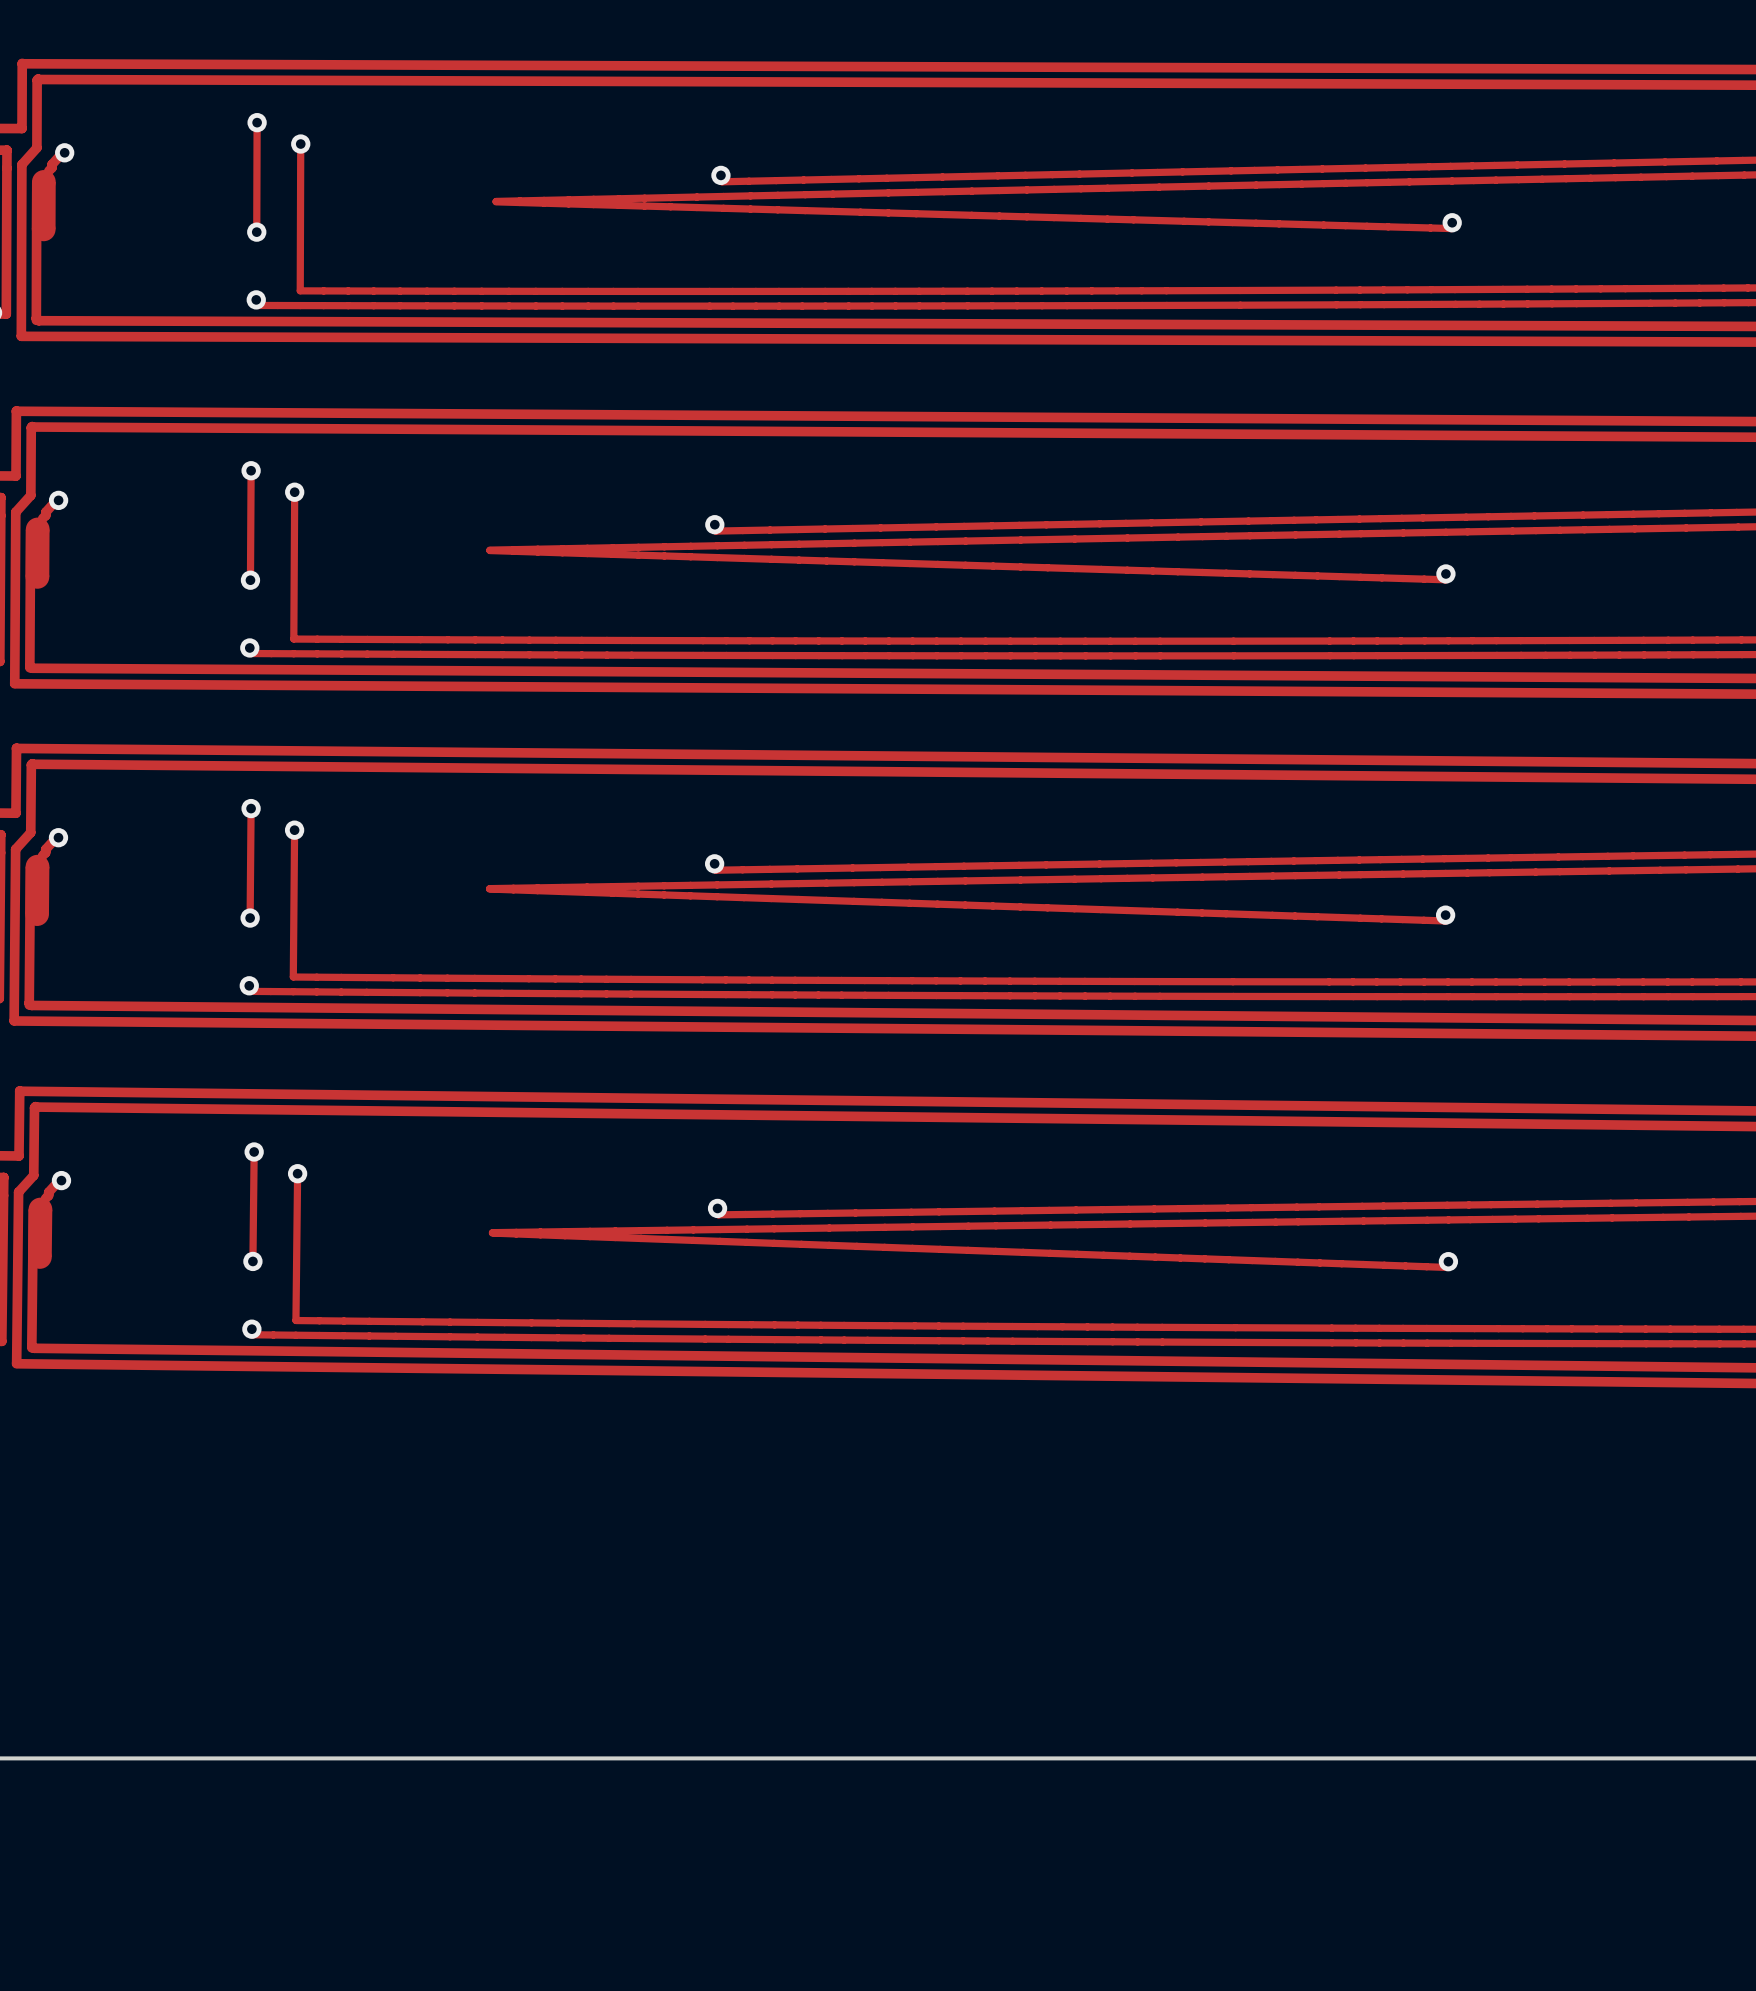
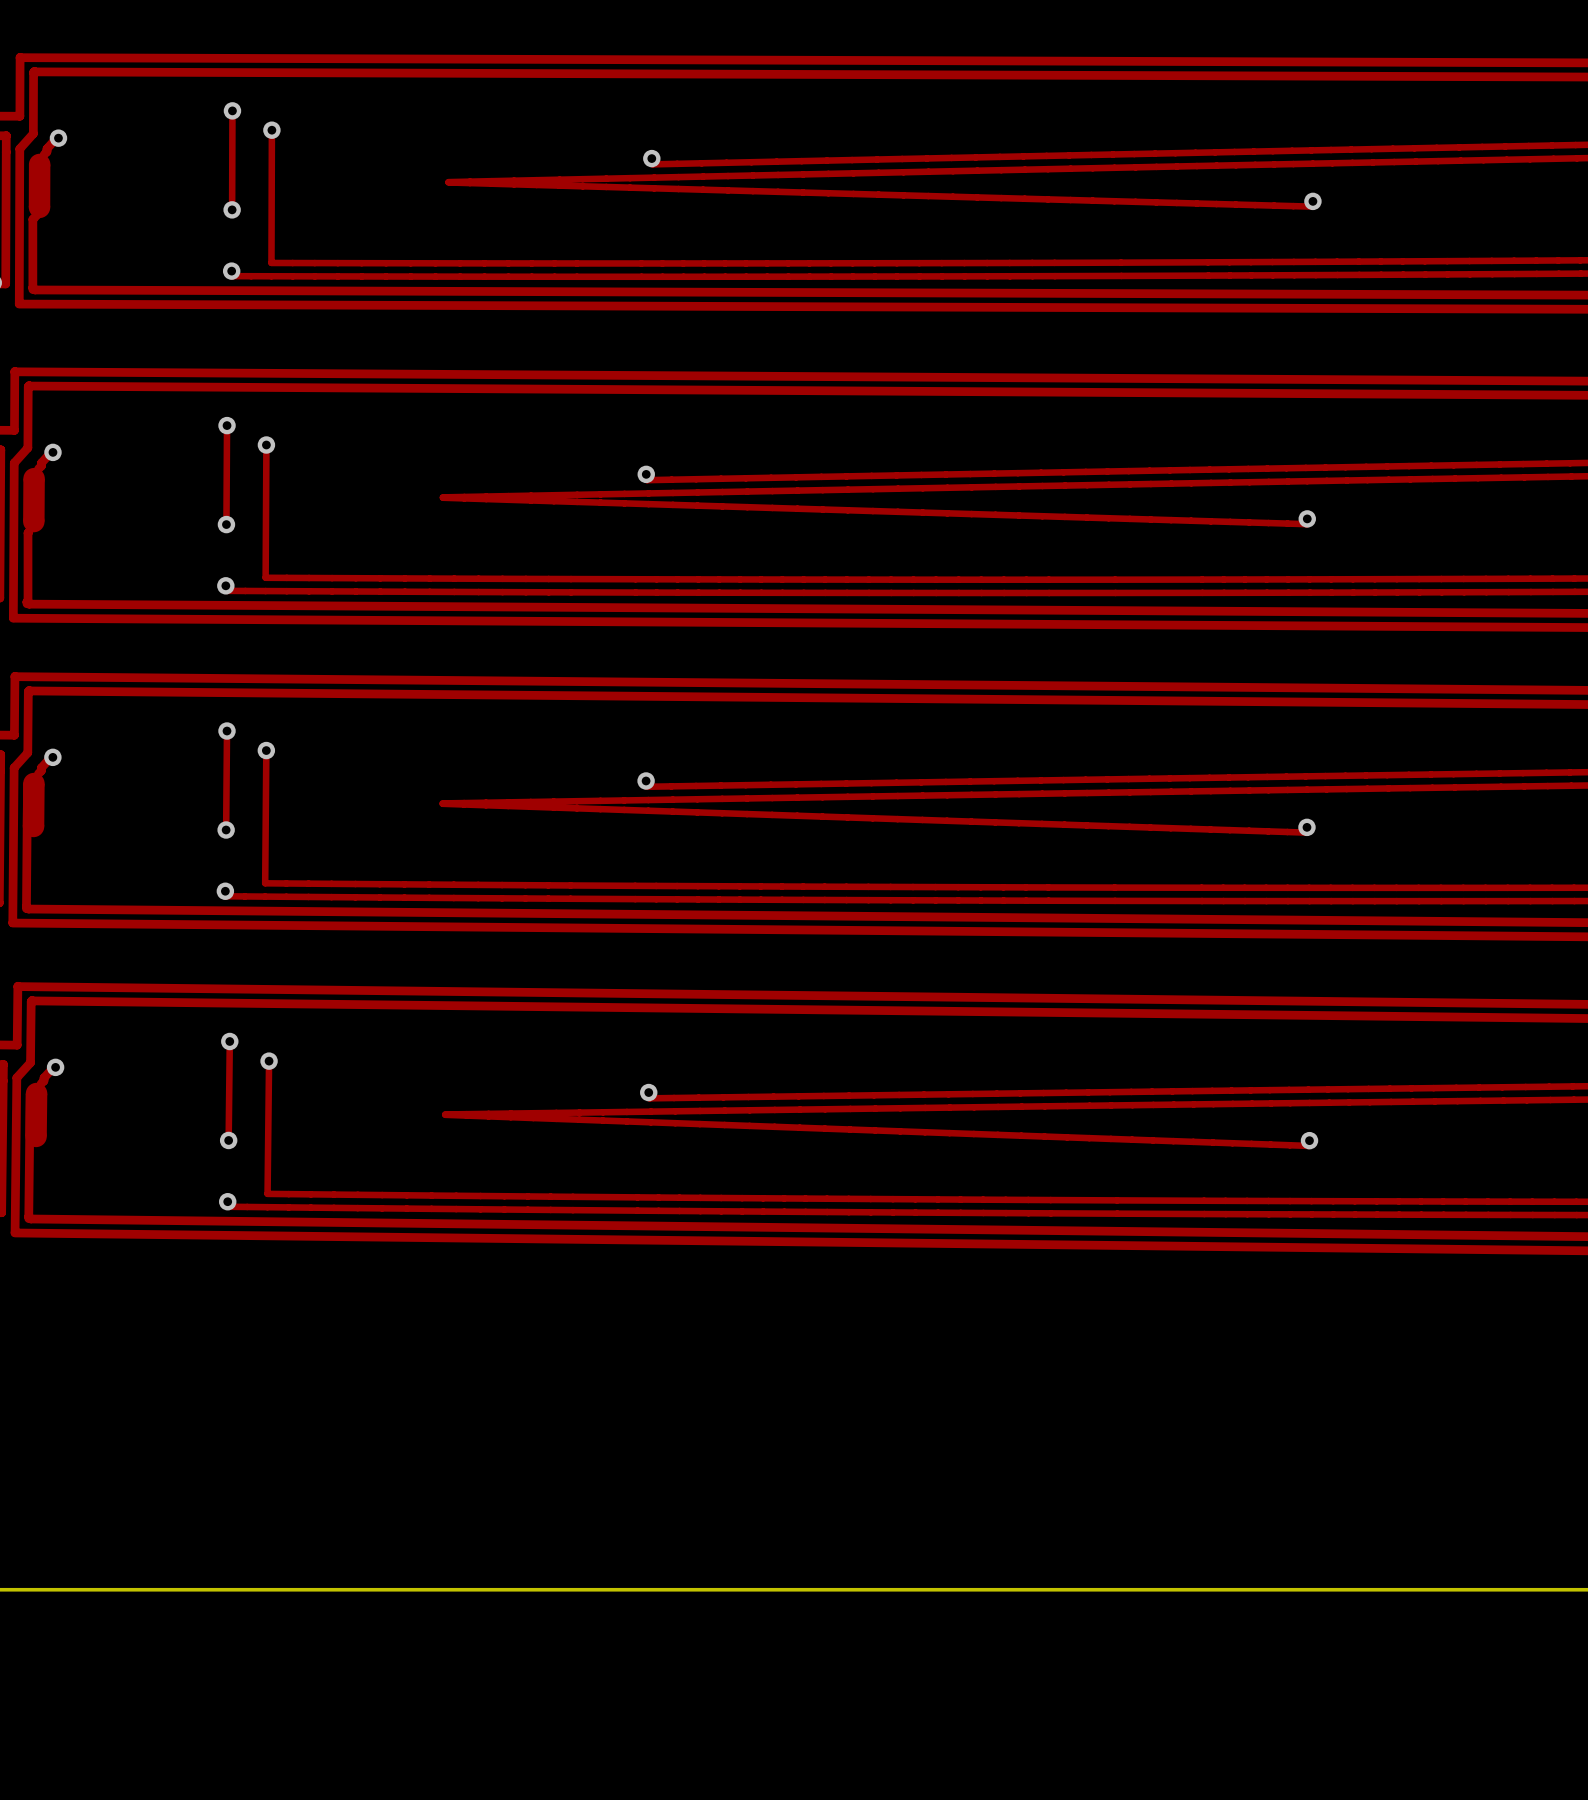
track: (36, 182) (36, 318) -> (39, 207) (39, 212) (32, 219) (32, 287)
track: (30, 530) (29, 665) -> (28, 532) (26, 601)

